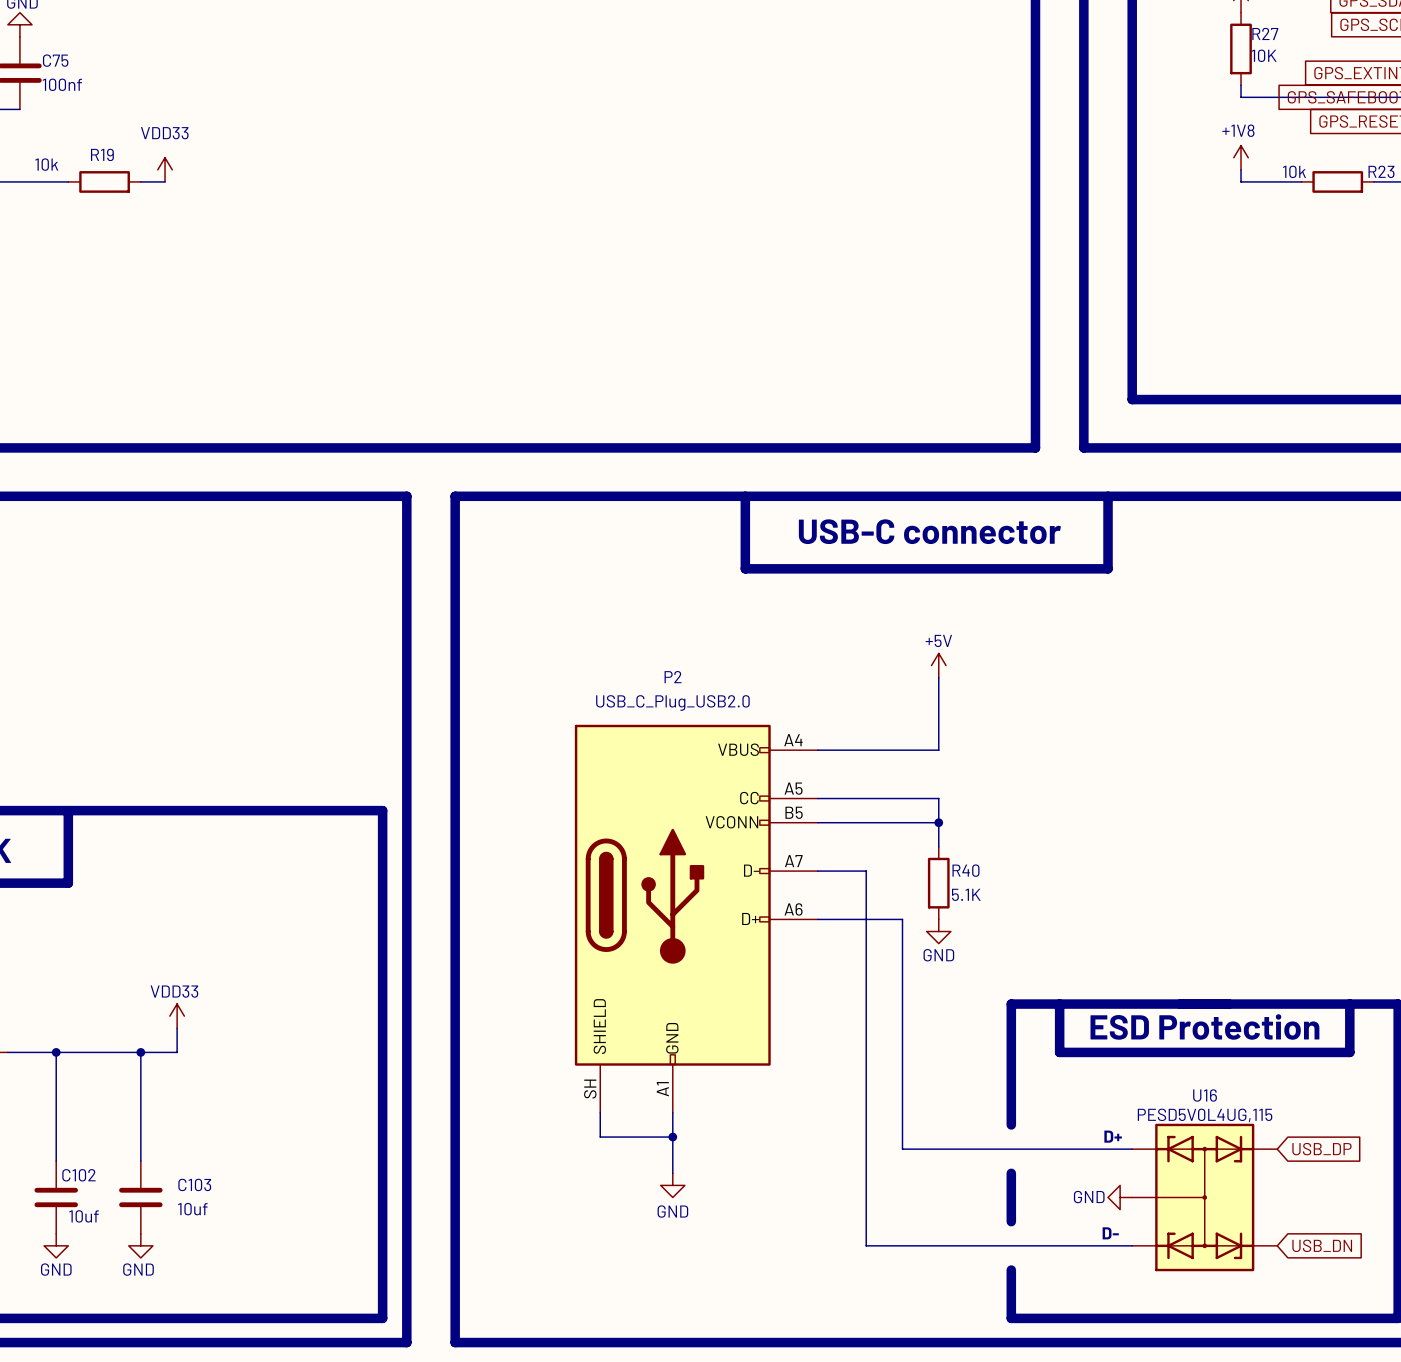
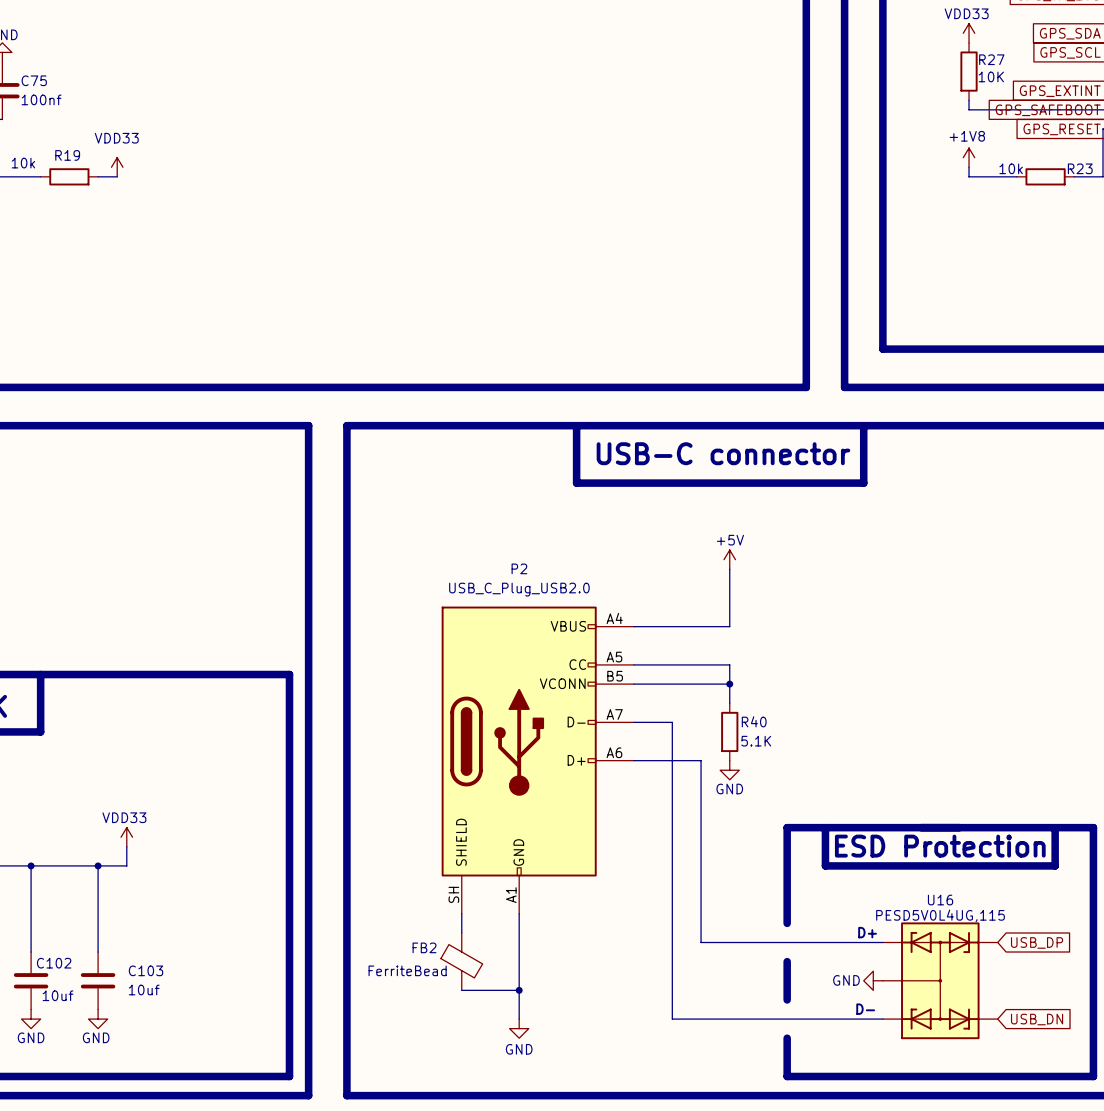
wire: (600, 1137) (672, 1137) -> (461, 990) (519, 990)
junction: (672, 1137) -> none
FB2: none -> FerriteBead (461, 961)
wire: none -> (519, 961) (519, 1019)
power symbol position: GND (672, 1185) -> GND (519, 1028)
junction: none -> (519, 990)

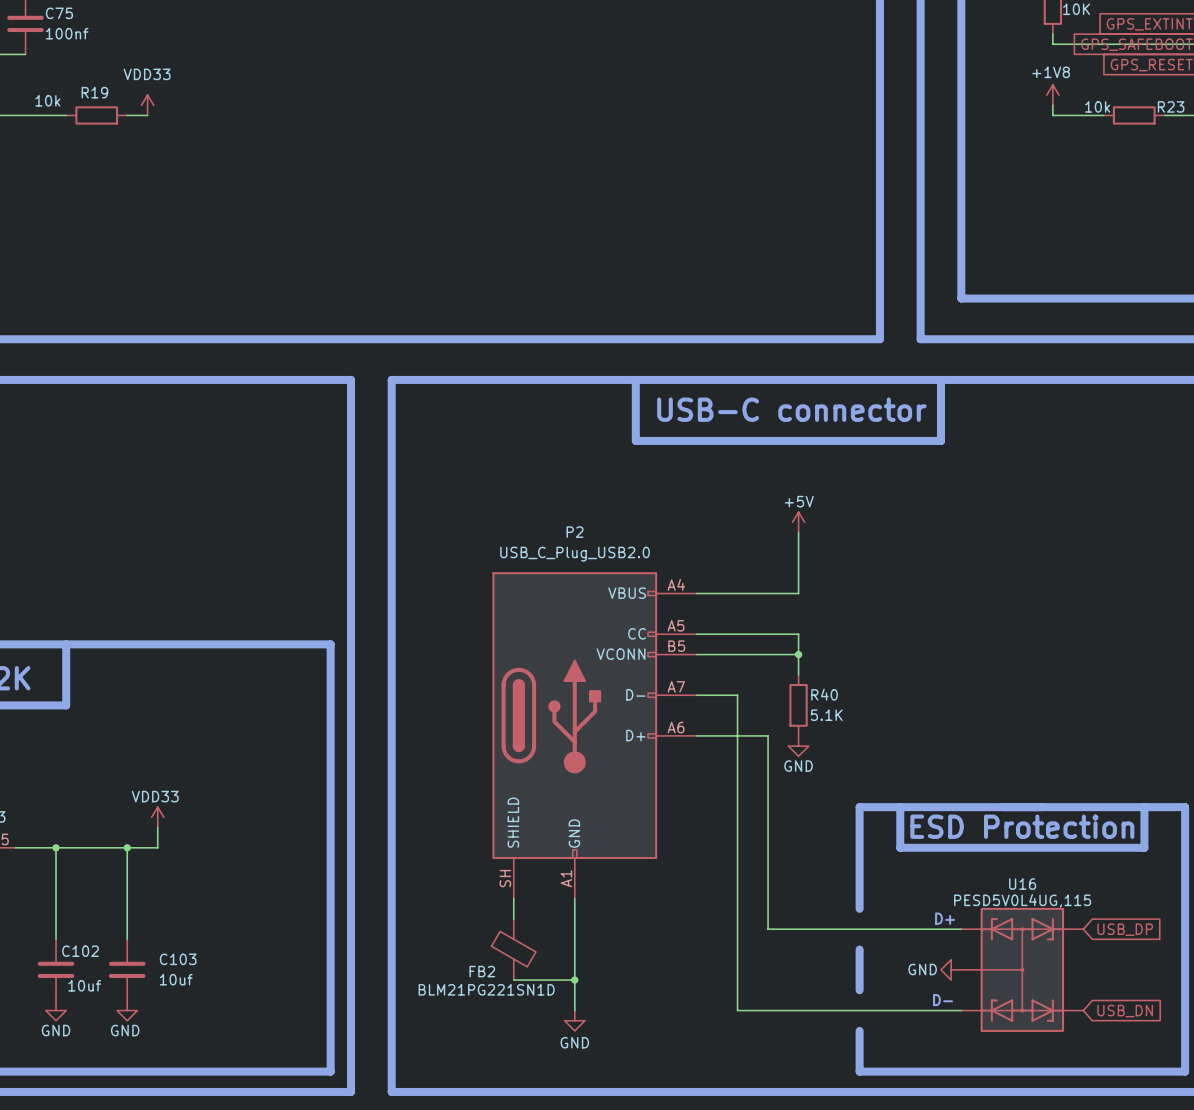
FB2 name position: FB2 (424, 947) -> FB2 (482, 971)
FB2 value: FerriteBead (407, 970) -> BLM21PG221SN1D (486, 989)

